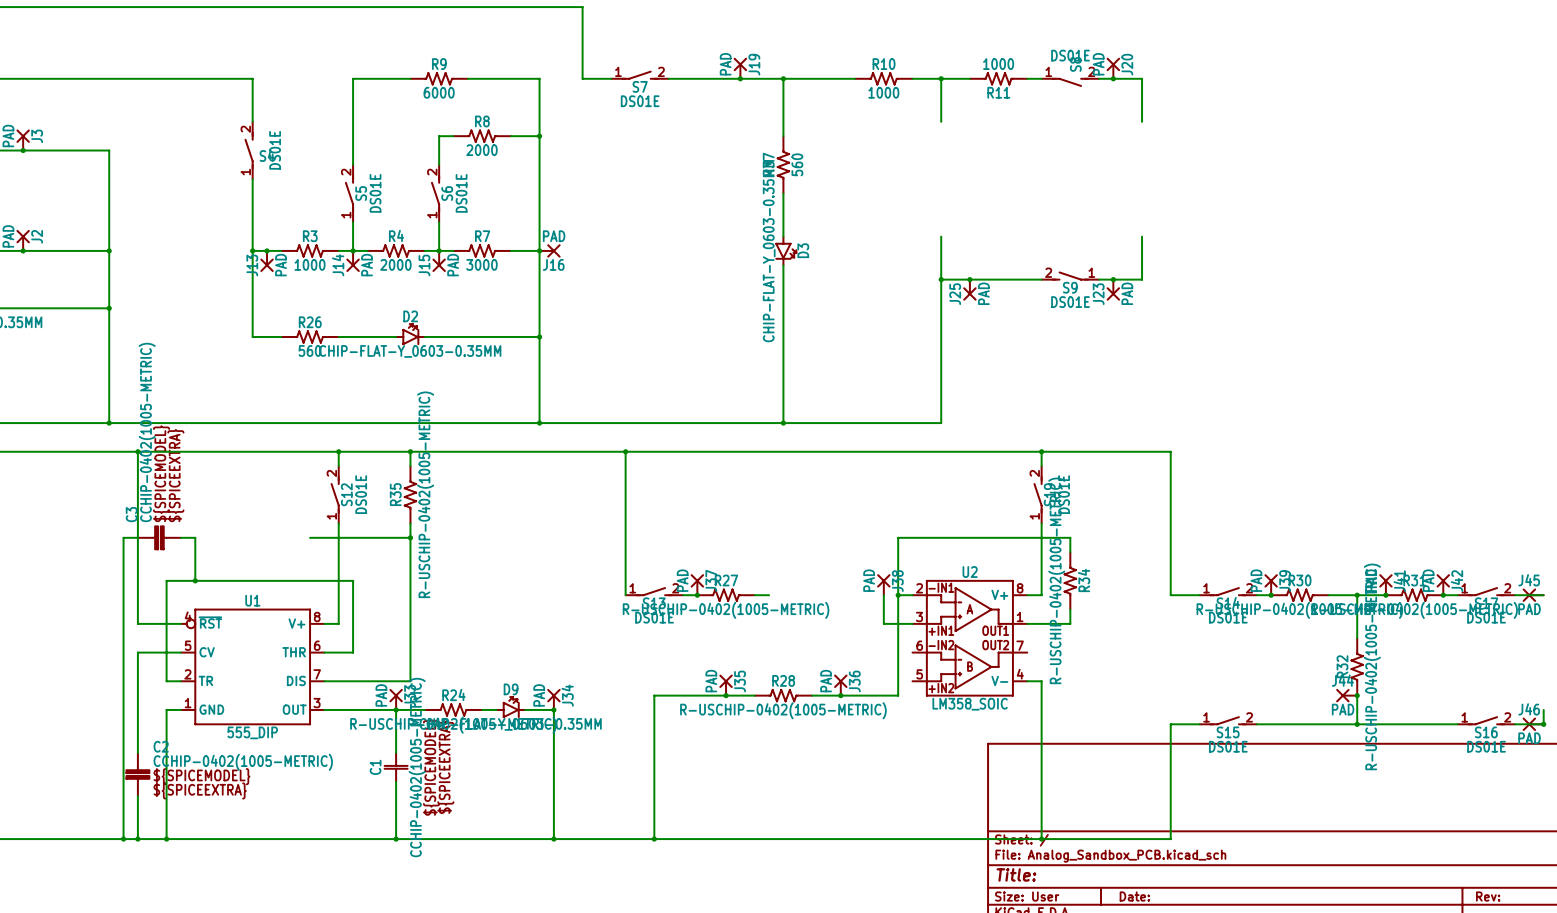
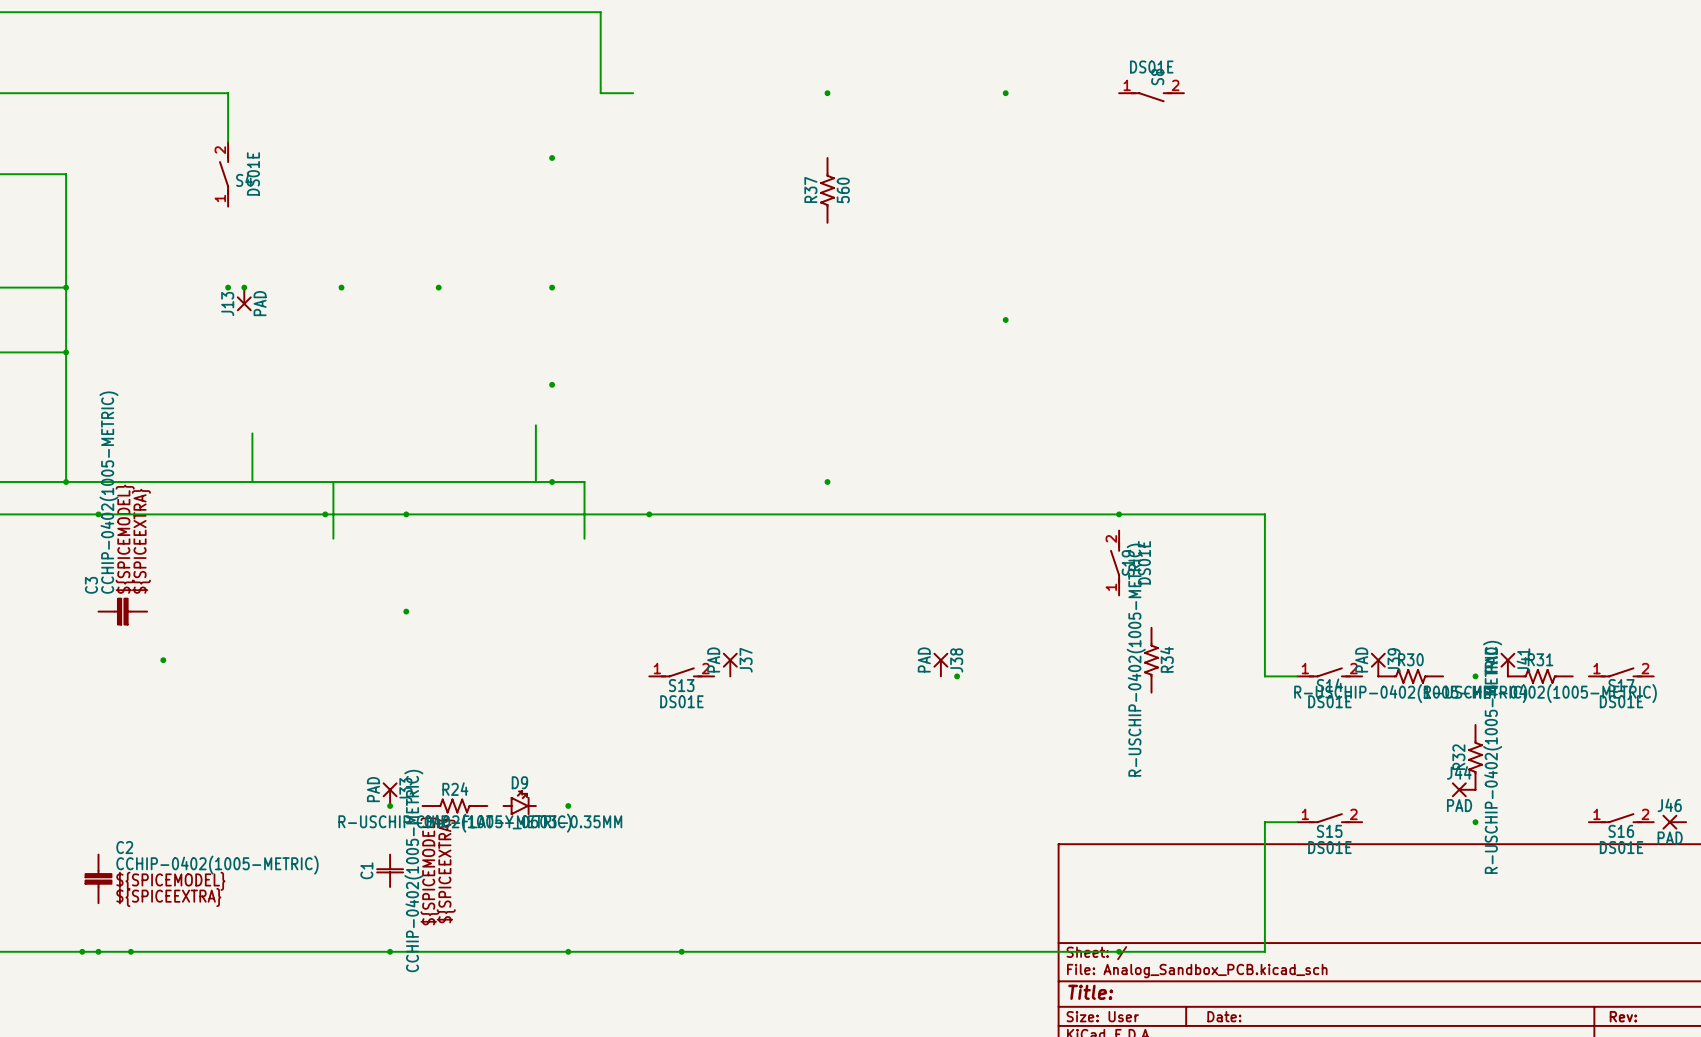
J19: PAD (740, 68) -> none
J20: PAD (1113, 68) -> none
S7: DS01E (639, 75) -> none
wire: (410, 78) (353, 78) (353, 164) -> none
R9: 6000 (439, 78) -> none
wire: (467, 78) (539, 78) (539, 423) -> none
wire: (668, 78) (855, 78) -> none
junction: (740, 78) -> none
wire: (783, 78) (783, 136) -> none
R10: 1000 (883, 78) -> none
wire: (912, 78) (969, 78) -> none
wire: (941, 78) (941, 121) -> none
R11: 1000 (998, 78) -> none
wire: (1027, 78) (1041, 78) -> none
wire: (1099, 78) (1142, 78) (1142, 121) -> none
junction: (1113, 78) -> none
wire: (453, 136) (439, 136) (439, 164) -> none
R8: 2000 (482, 136) -> none
wire: (510, 136) (539, 136) -> none
wire: (252, 179) (252, 337) (281, 337) -> none
S5: DS01E (349, 193) -> none
S6: DS01E (435, 193) -> none
wire: (783, 193) (783, 236) -> none
wire: (353, 222) (353, 250) -> none
wire: (439, 222) (439, 250) -> none
wire: (941, 236) (941, 423) (568, 423) -> (584, 538) (584, 482)
wire: (1142, 236) (1142, 279) (1099, 279) -> none
wire: (252, 250) (281, 250) -> none
R3: 1000 (310, 250) -> none
wire: (338, 250) (367, 250) -> none
R4: 2000 (396, 250) -> none
wire: (424, 250) (453, 250) -> none
R7: 3000 (482, 250) -> none
wire: (510, 250) (539, 250) -> none
J16: PAD (549, 250) -> none
D3: CHIP-FLAT-Y_0603-0.35MM (786, 250) -> none
J14: PAD (353, 261) -> none
J15: PAD (439, 261) -> none
wire: (783, 265) (783, 423) -> none
S9: DS01E (1070, 276) -> none
wire: (941, 279) (1041, 279) -> none
junction: (969, 279) -> none
junction: (1113, 279) -> none
J25: PAD (969, 289) -> none
J23: PAD (1113, 289) -> none
D2: CHIP-FLAT-Y_0603-0.35MM (410, 334) -> none
R26: 560 (310, 337) -> none
wire: (338, 337) (396, 337) -> none
wire: (424, 337) (539, 337) -> none
wire: none -> (535, 425) (535, 482)
wire: none -> (252, 433) (252, 482)
wire: none -> (333, 482) (333, 538)
wire: (137, 451) (137, 623) (180, 623) -> none
wire: (338, 451) (338, 466) -> none
wire: (410, 451) (410, 466) -> none
wire: (625, 451) (625, 595) -> none
wire: (1041, 451) (1041, 466) -> none
S12: DS01E (335, 494) -> none
R35: R-USCHIP-0402(1005-METRIC) (410, 494) -> none
wire: (338, 523) (338, 623) (324, 623) -> none
wire: (410, 523) (410, 681) (324, 681) -> none
wire: (1041, 523) (1041, 595) (1027, 595) -> none
wire: (137, 537) (123, 537) (123, 839) -> none
wire: (180, 537) (195, 537) (195, 580) -> none
wire: (310, 537) (410, 537) -> none
wire: (1070, 552) (1070, 537) (898, 537) (898, 695) (812, 695) -> none
J42: PAD (1443, 584) -> none
wire: (683, 595) (697, 595) -> none
junction: (697, 595) -> none
R27: R-USCHIP-0402(1005-METRIC) (726, 595) -> none
wire: (754, 595) (769, 595) -> none
wire: (883, 595) (883, 623) (912, 623) -> none
wire: (898, 595) (912, 595) -> none
wire: (1256, 595) (1271, 595) -> none
junction: (1271, 595) -> none
wire: (1328, 595) (1385, 595) -> none
wire: (1357, 595) (1357, 638) -> none
junction: (1385, 595) -> none
wire: (1443, 595) (1457, 595) -> none
junction: (1443, 595) -> none
wire: (1515, 595) (1543, 595) -> none
J45: PAD (1533, 595) -> none
wire: (1070, 609) (1070, 623) (1027, 623) -> none
U2: LM358_SOIC (969, 638) -> none
wire: (180, 652) (137, 652) (137, 753) -> none
wire: (324, 652) (353, 652) (353, 580) (166, 580) (166, 681) (180, 681) -> none
U1: 555_DIP (252, 666) -> none
wire: (1027, 681) (1041, 681) (1041, 839) -> none
J35: PAD (726, 685) -> none
J36: PAD (840, 685) -> none
junction: (726, 695) -> none
wire: (754, 695) (654, 695) (654, 839) -> none
R28: R-USCHIP-0402(1005-METRIC) (783, 695) -> none
junction: (840, 695) -> none
wire: (1357, 695) (1357, 724) -> none
junction: (1357, 695) -> none
J34: PAD (553, 699) -> none
wire: (180, 709) (166, 709) (166, 839) -> none
wire: (324, 709) (424, 709) -> none
wire: (396, 709) (396, 753) -> none
wire: (482, 709) (496, 709) -> none
wire: (525, 709) (553, 709) (553, 839) -> none
wire: (1543, 709) (1543, 724) (1515, 724) -> none
wire: (1256, 724) (1457, 724) -> none
junction: (1543, 724) -> none
wire: (396, 781) (396, 839) -> none
wire: (137, 796) (137, 839) -> none

